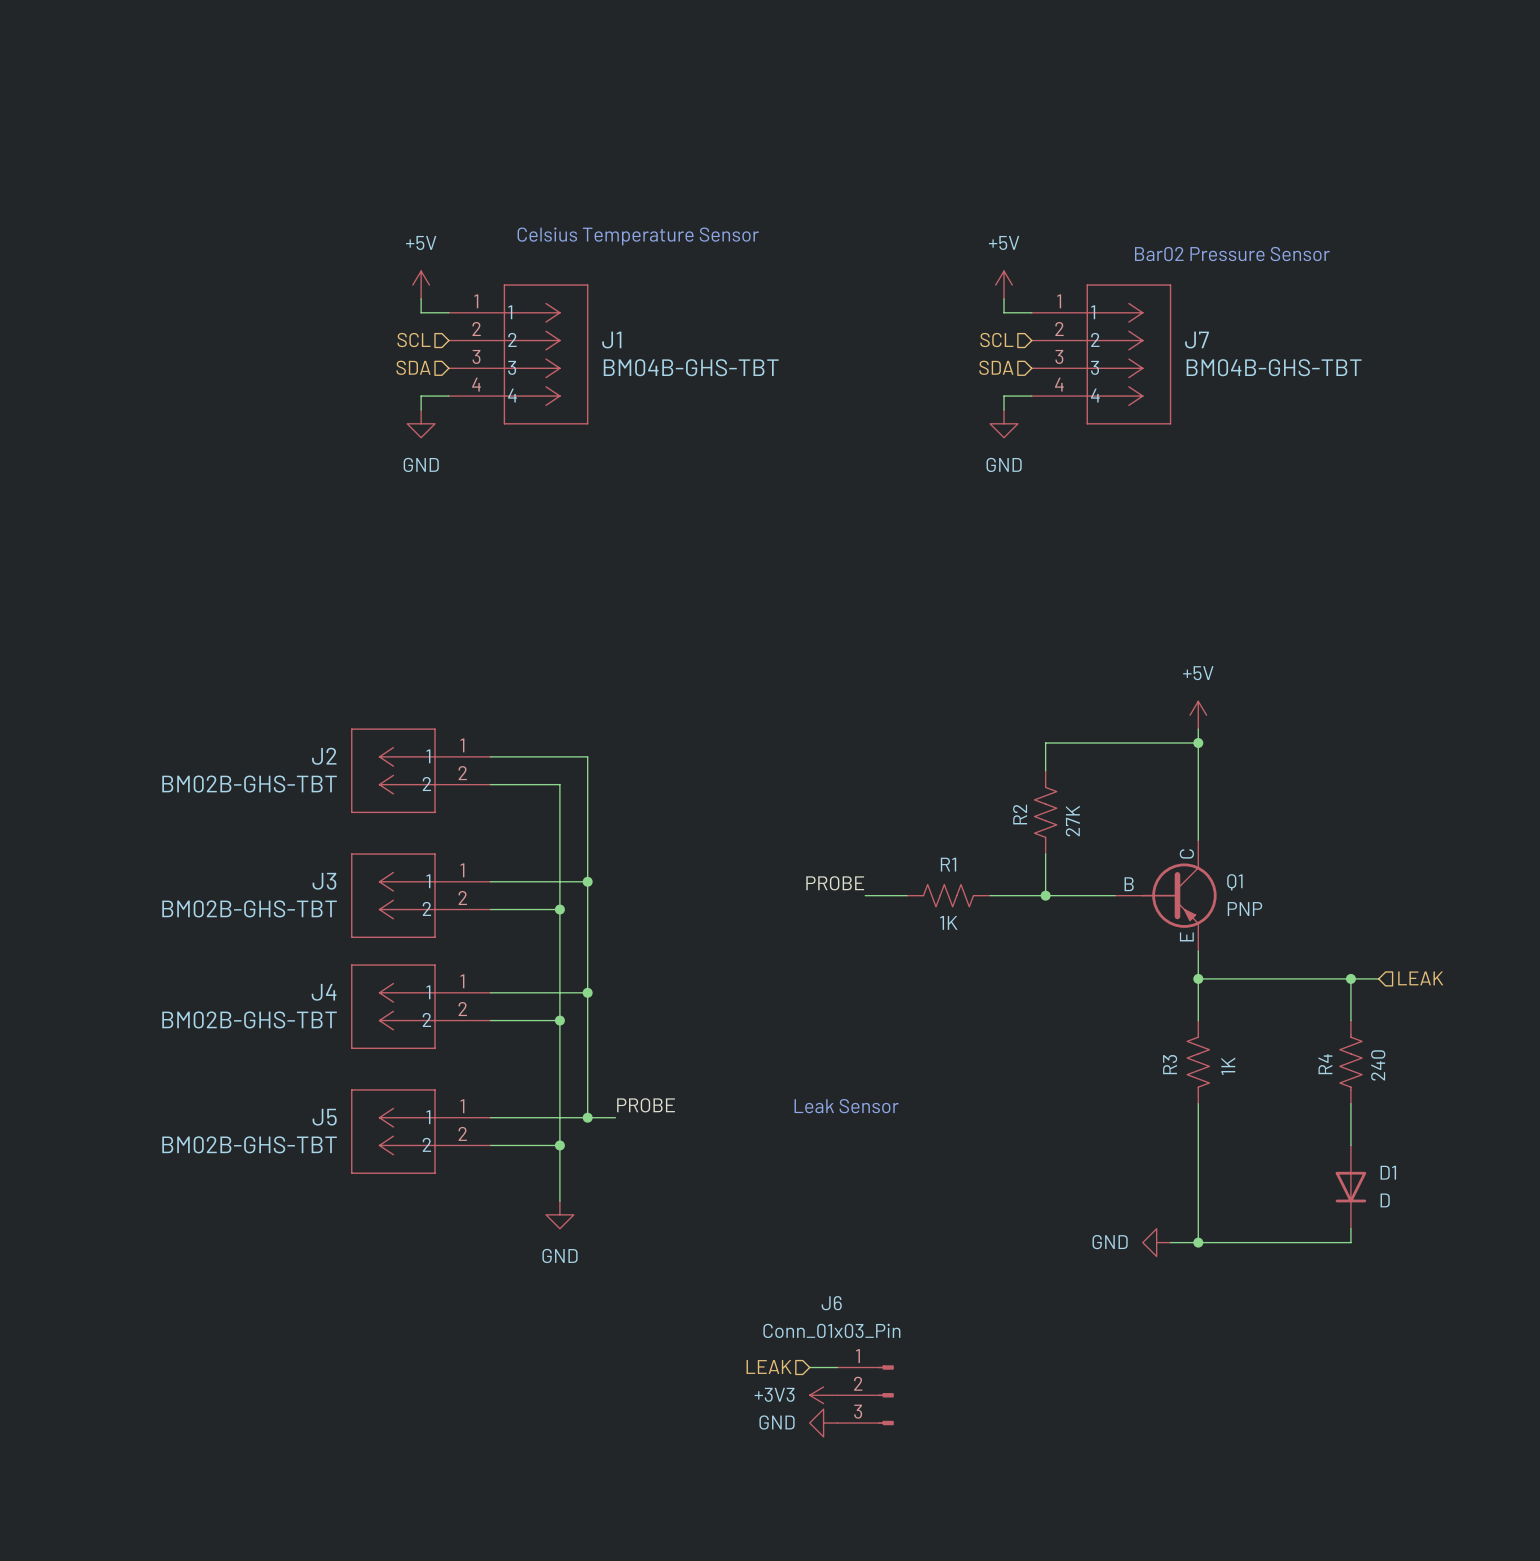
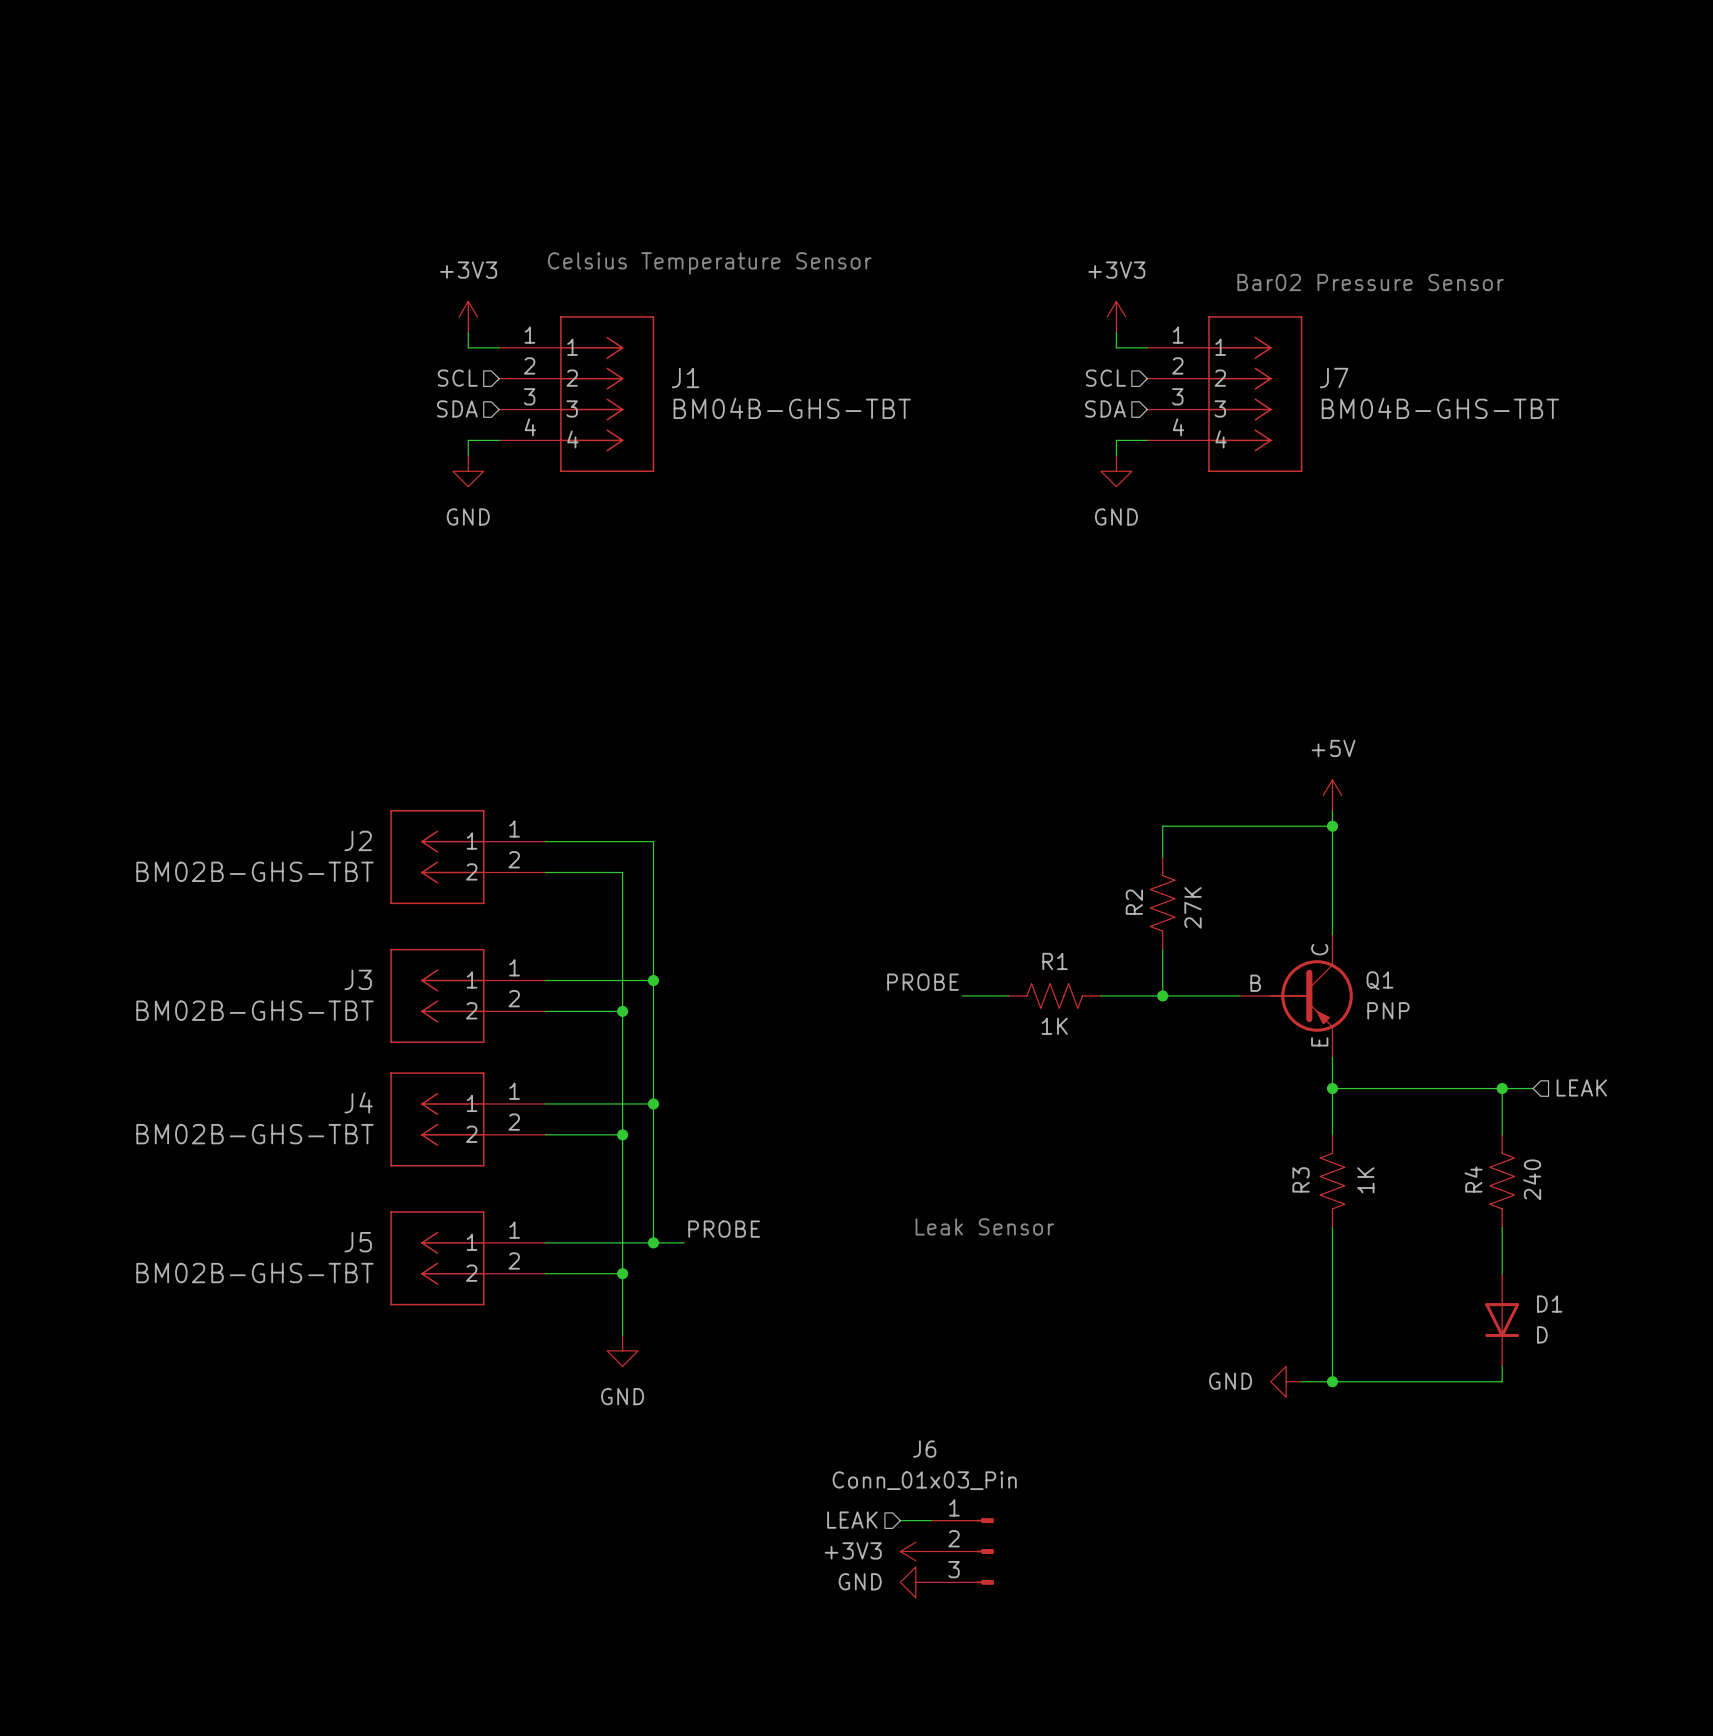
power symbol: +5V (421, 285) -> +3V3 (468, 316)
power symbol: +5V (1004, 285) -> +3V3 (1116, 316)
text position: Leak Sensor (846, 1106) -> Leak Sensor (984, 1226)

